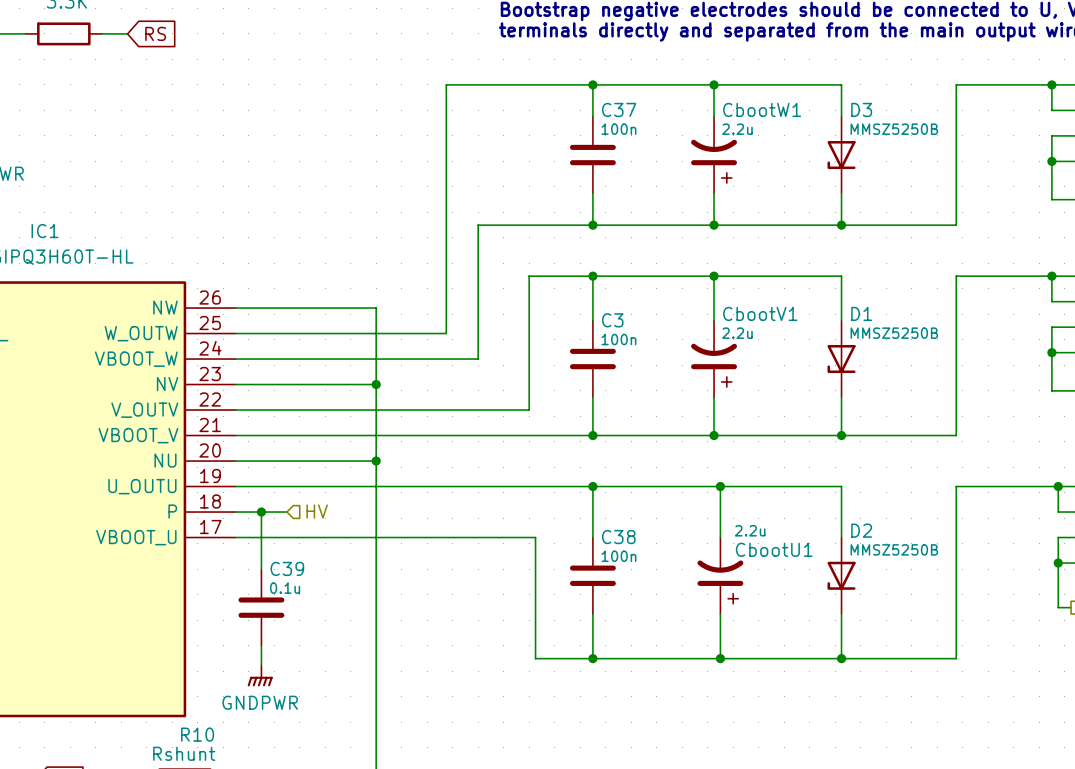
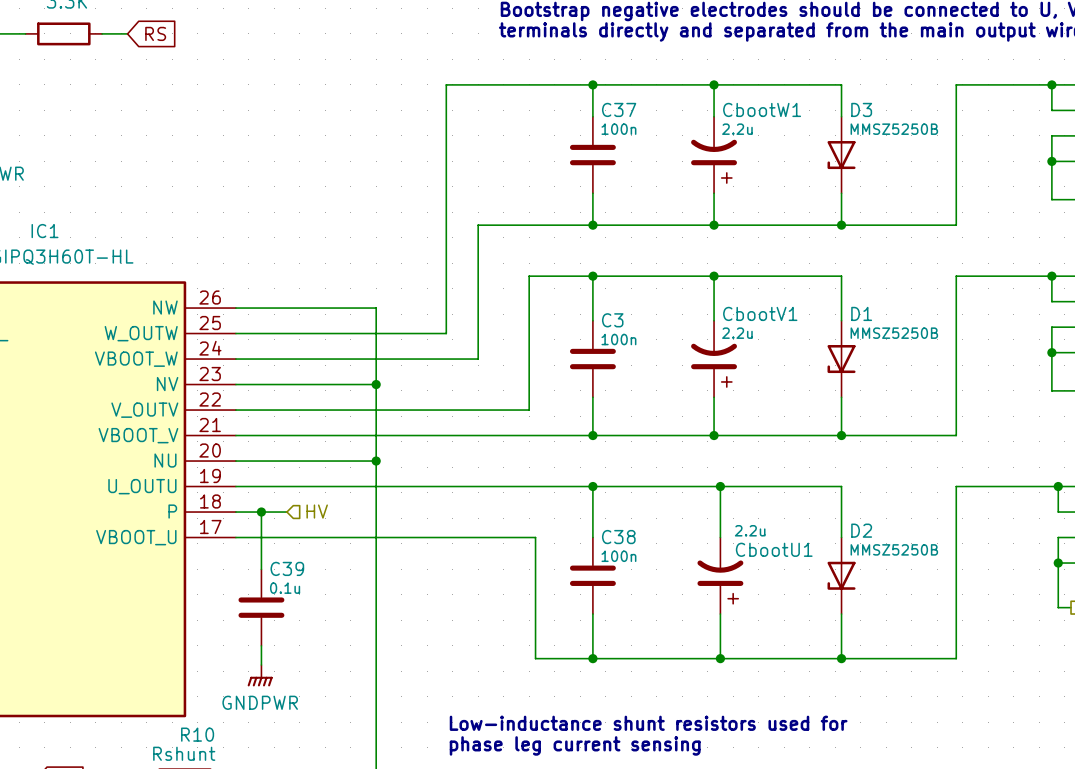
text: none -> Low-inductance shunt resistors used for (648, 723)
text: none -> phase leg current sensing (575, 745)

